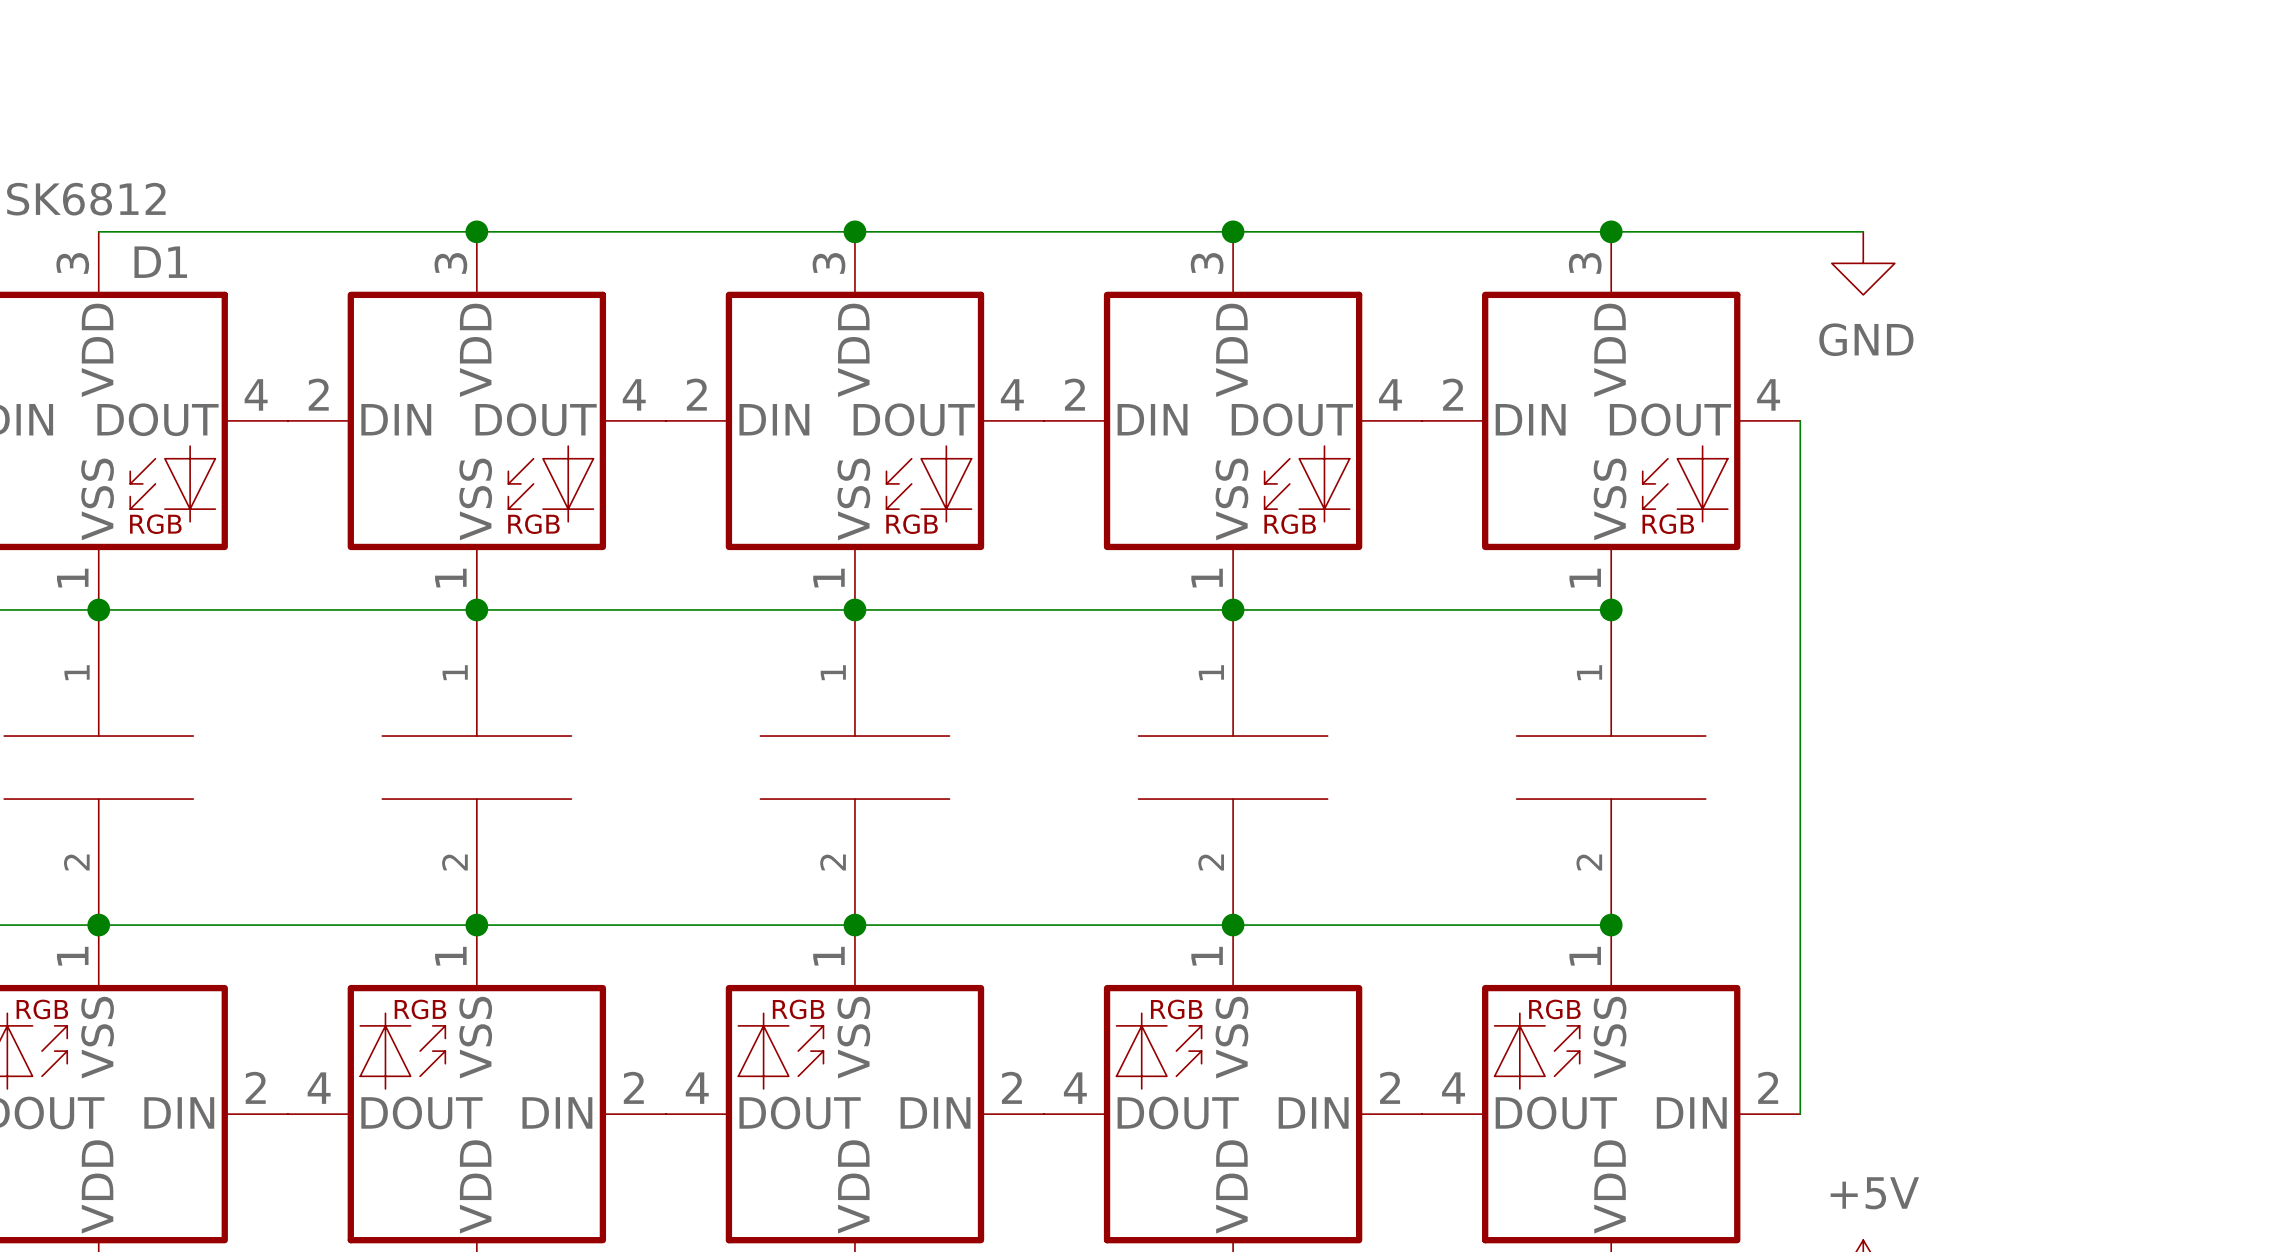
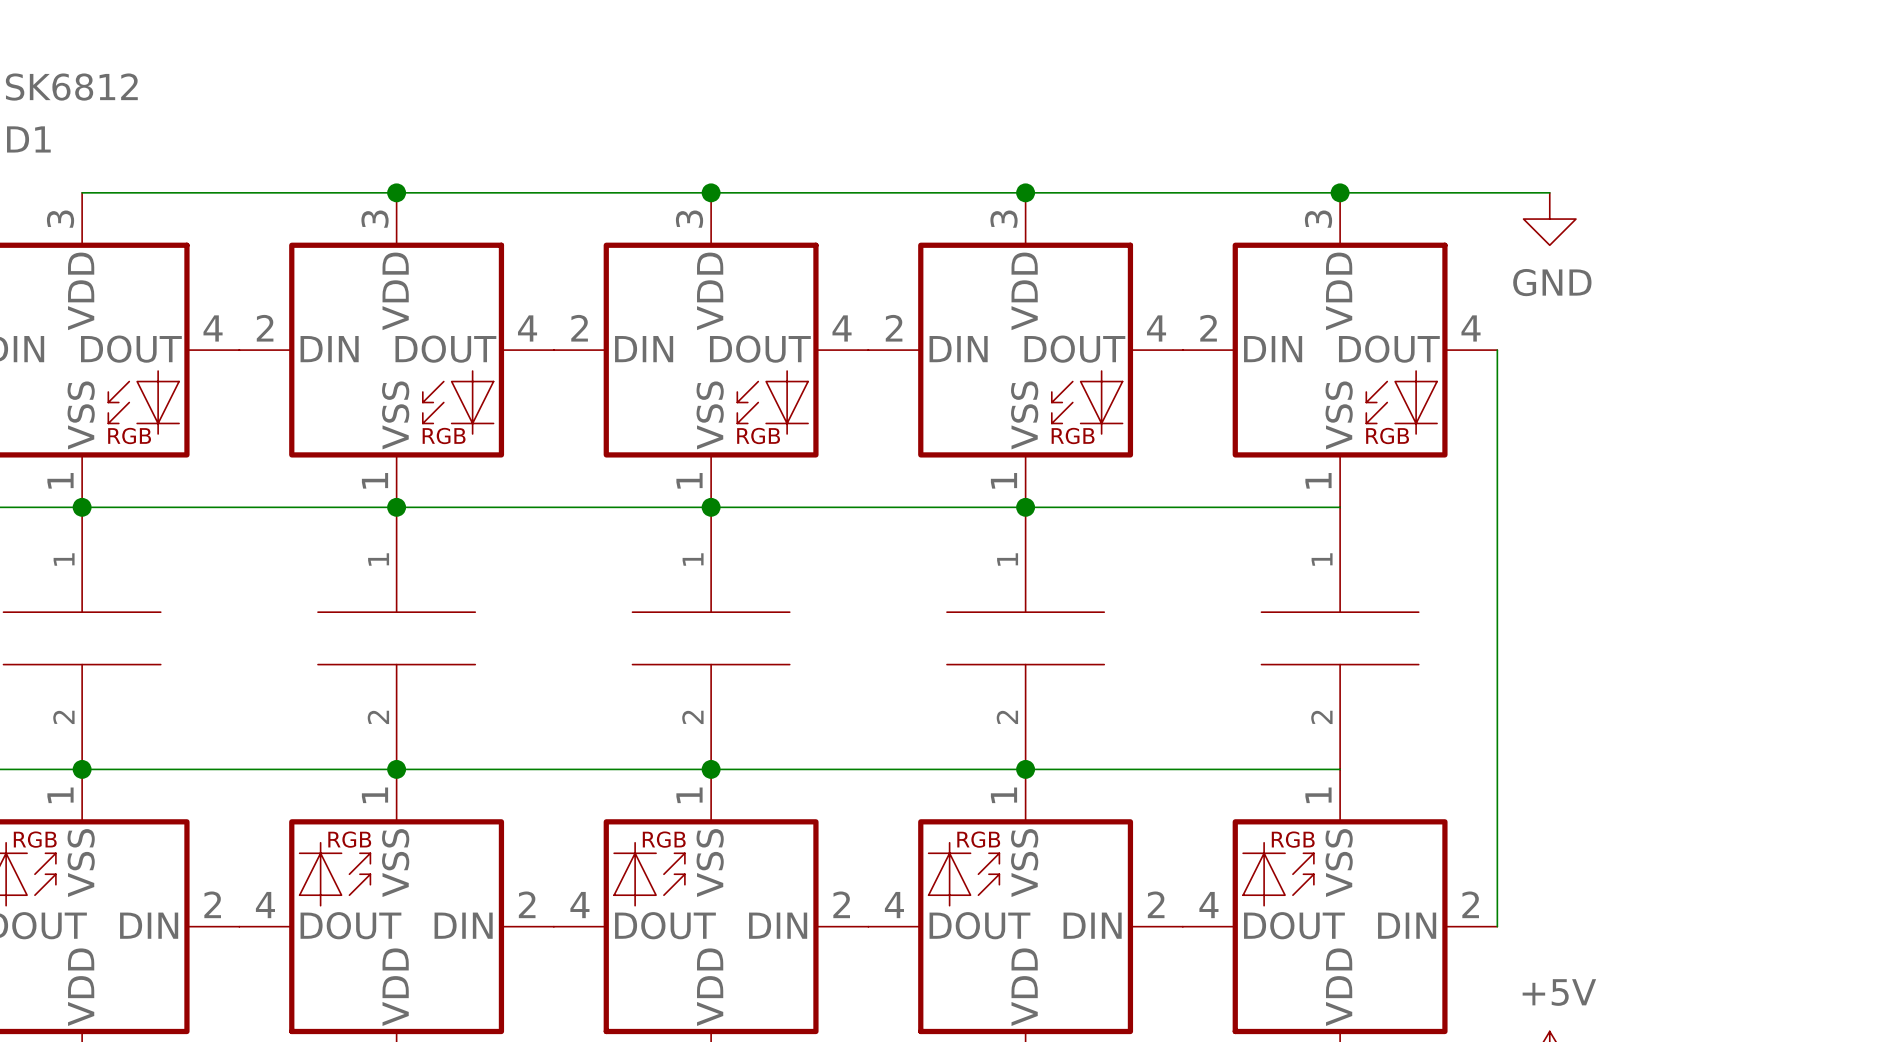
D1 value position: SK6812 (86, 199) -> SK6812 (71, 87)
D1 name position: D1 (160, 262) -> D1 (28, 139)
junction: (1611, 609) -> none
junction: (1611, 925) -> none

